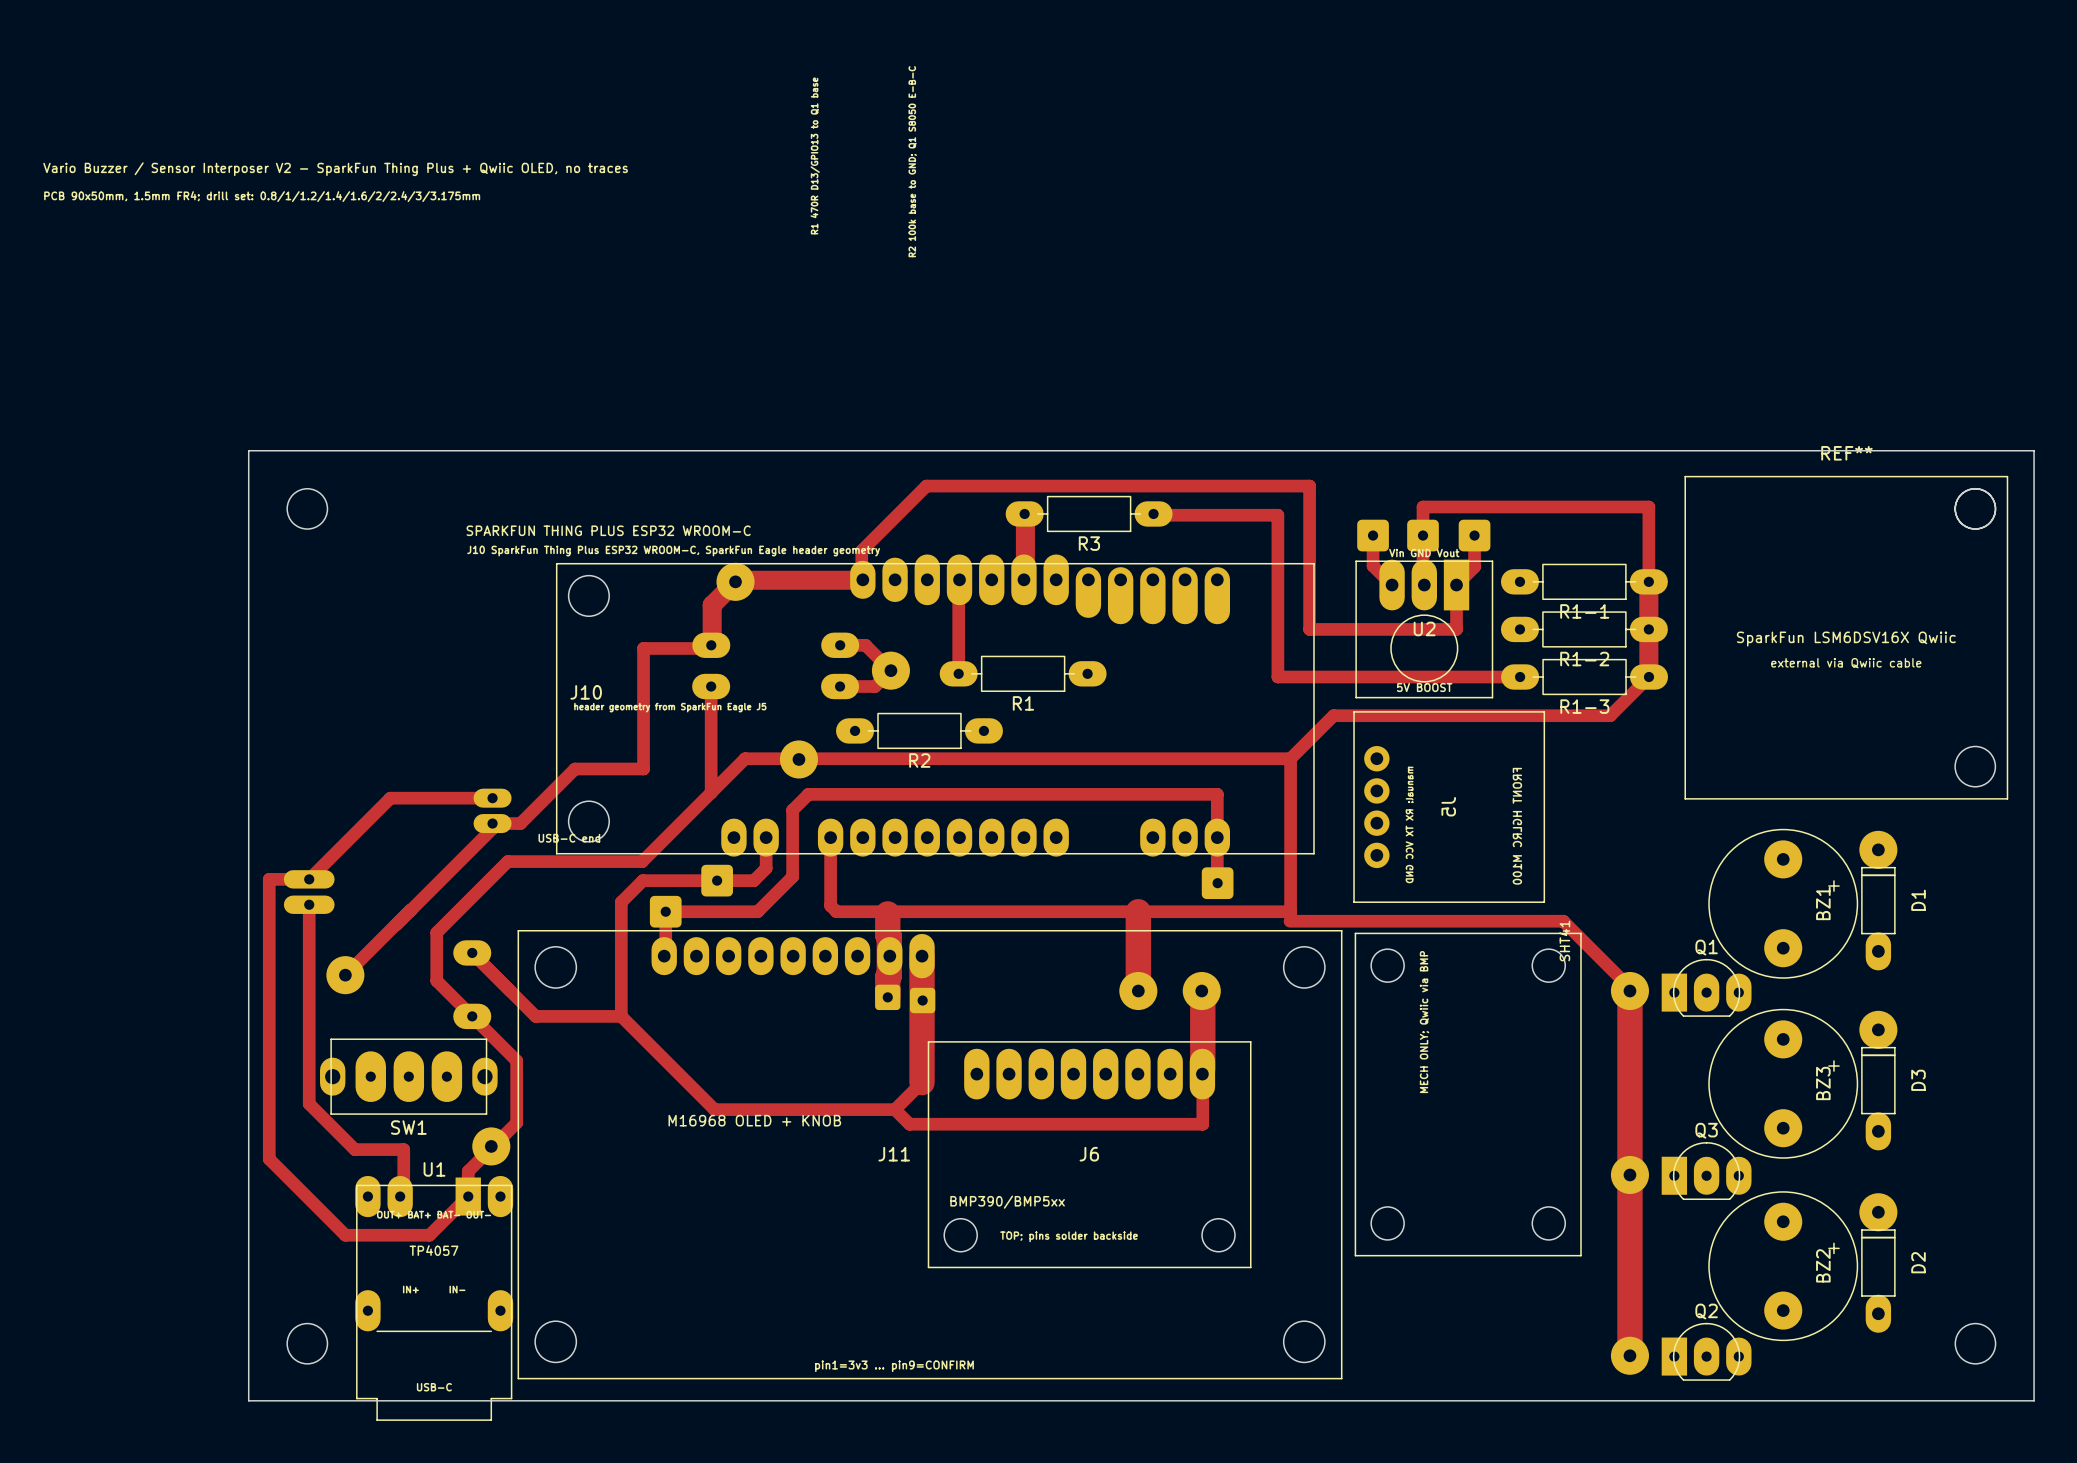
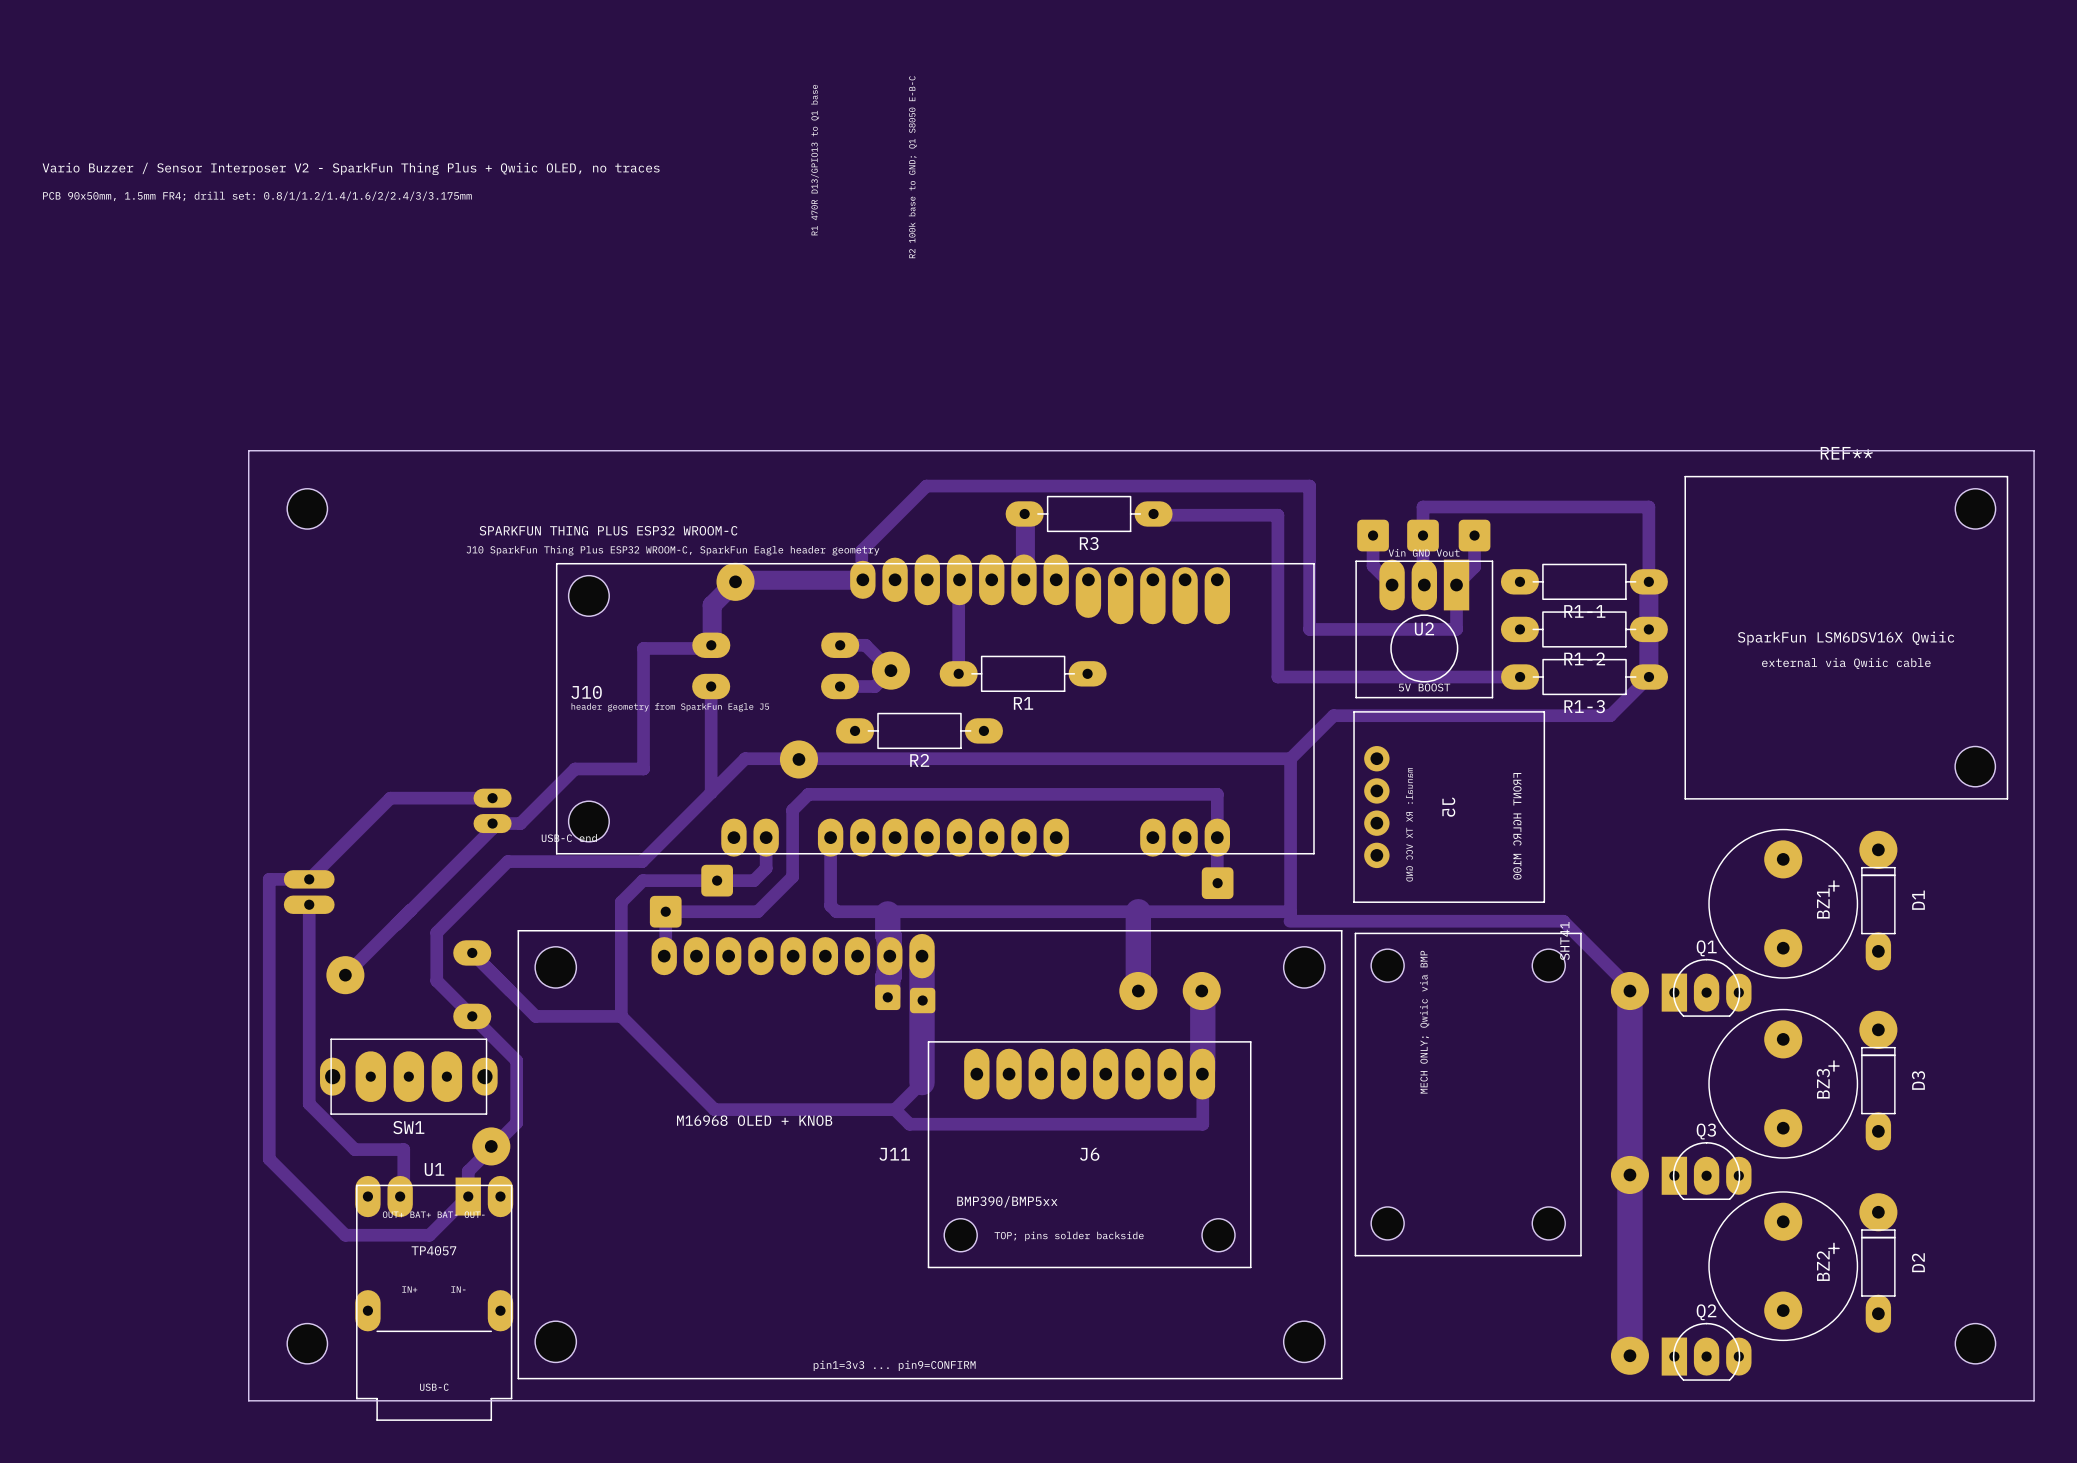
REF** footprint: [1684, 475, 2009, 800] -> [1684, 475, 2009, 800]

